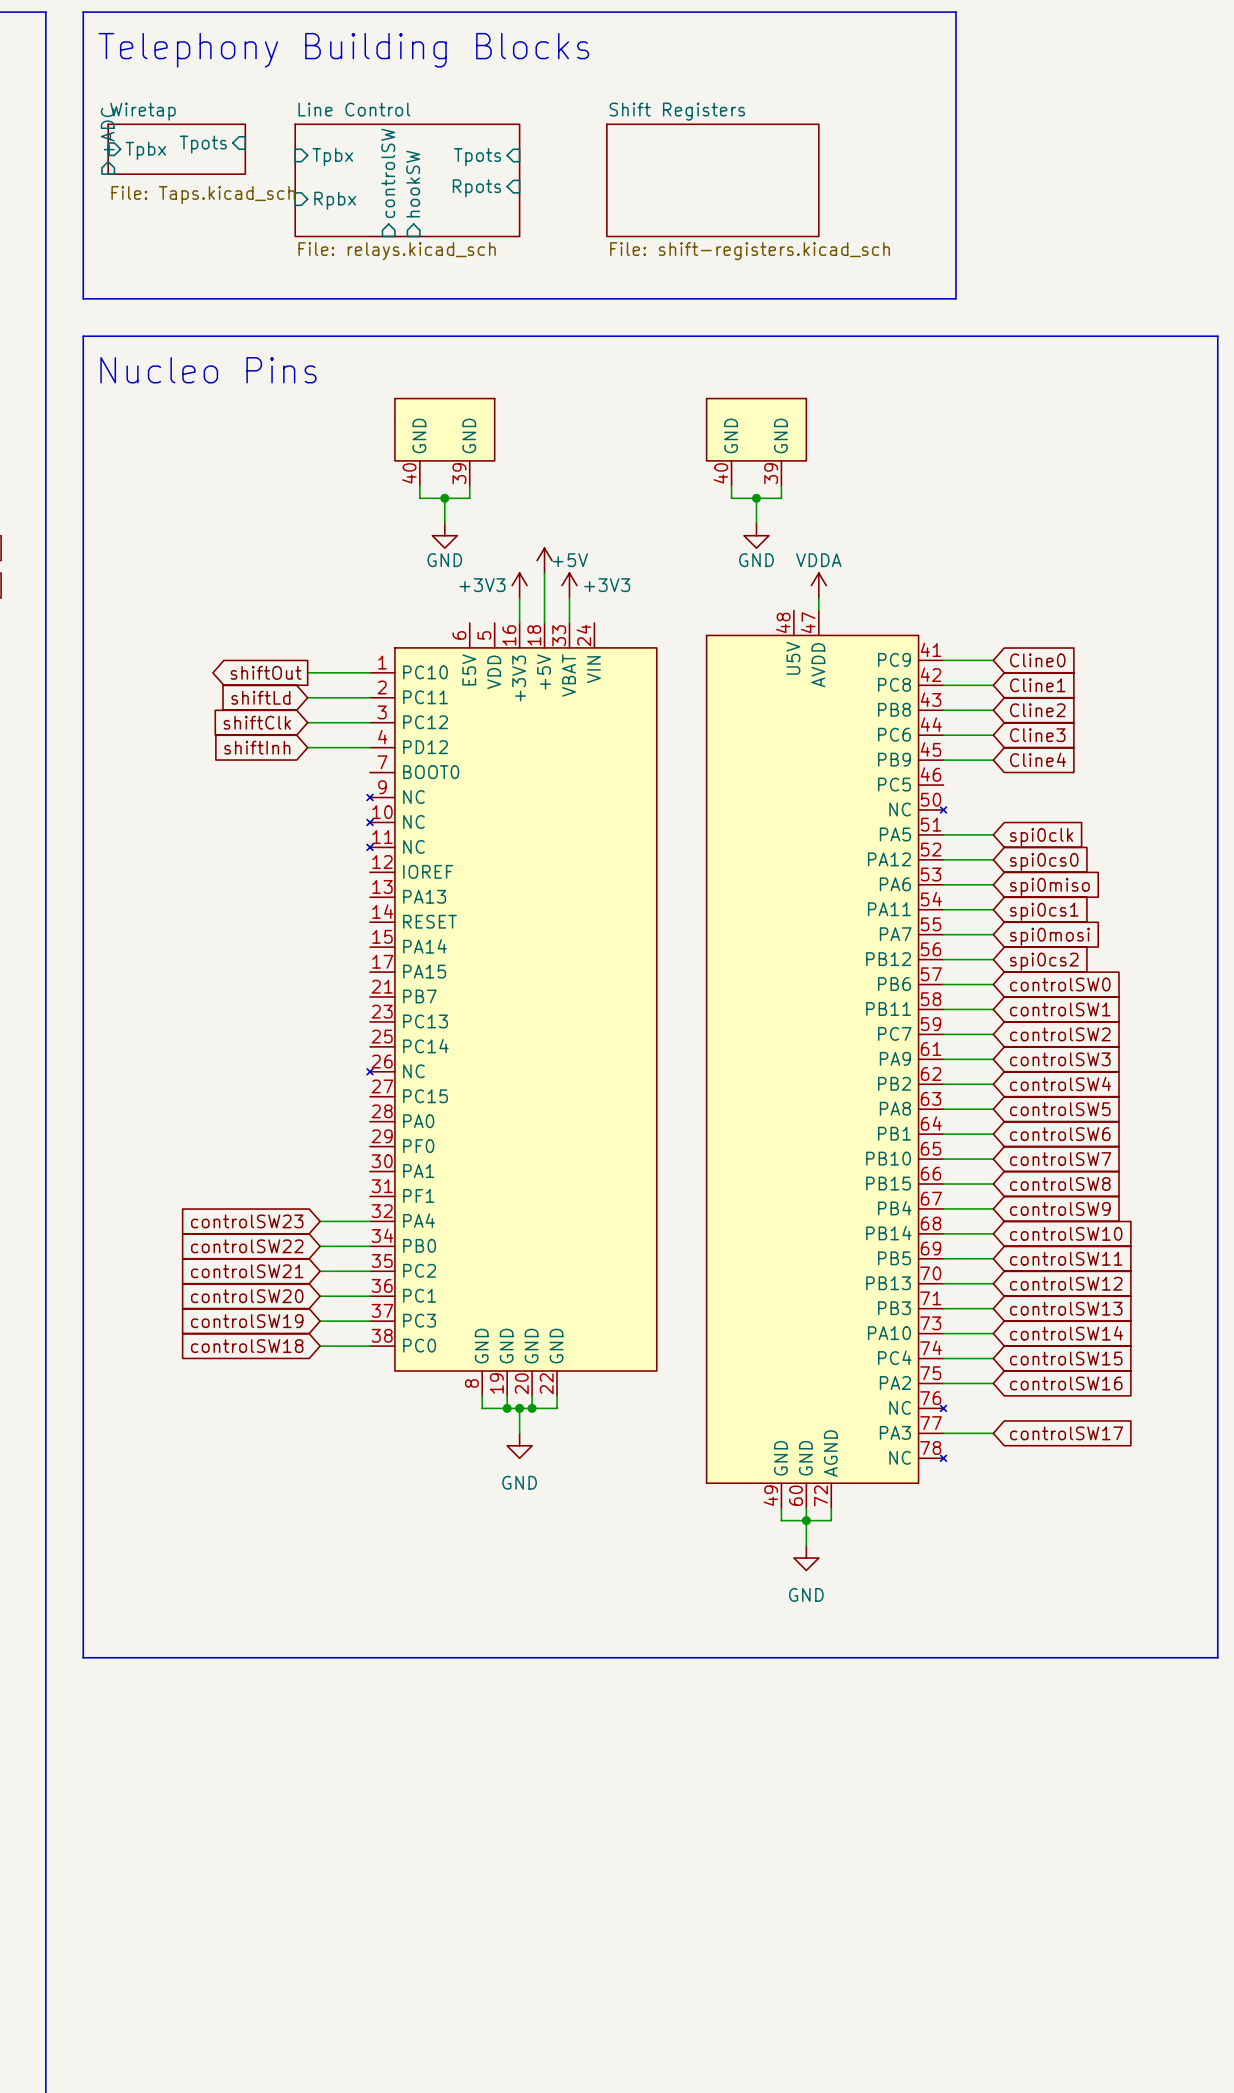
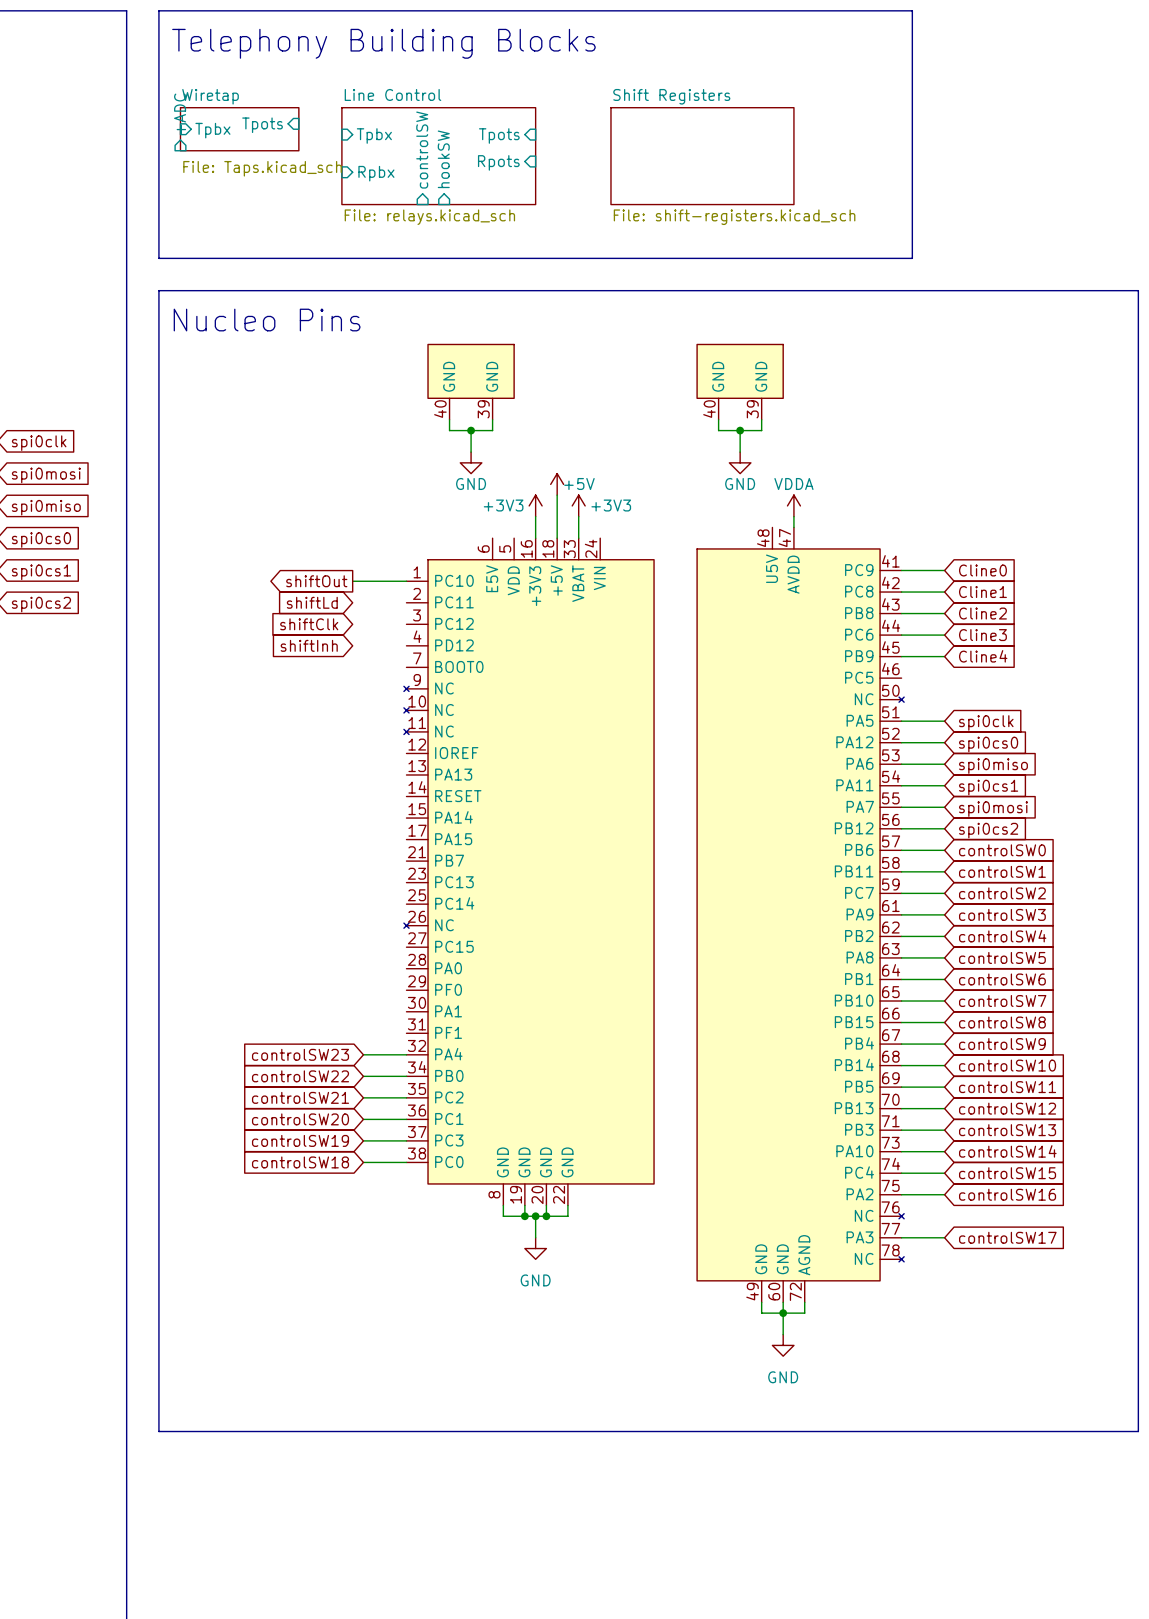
wire: (307, 697) (370, 697) -> none
wire: (307, 722) (370, 722) -> none
wire: (307, 747) (370, 747) -> none

